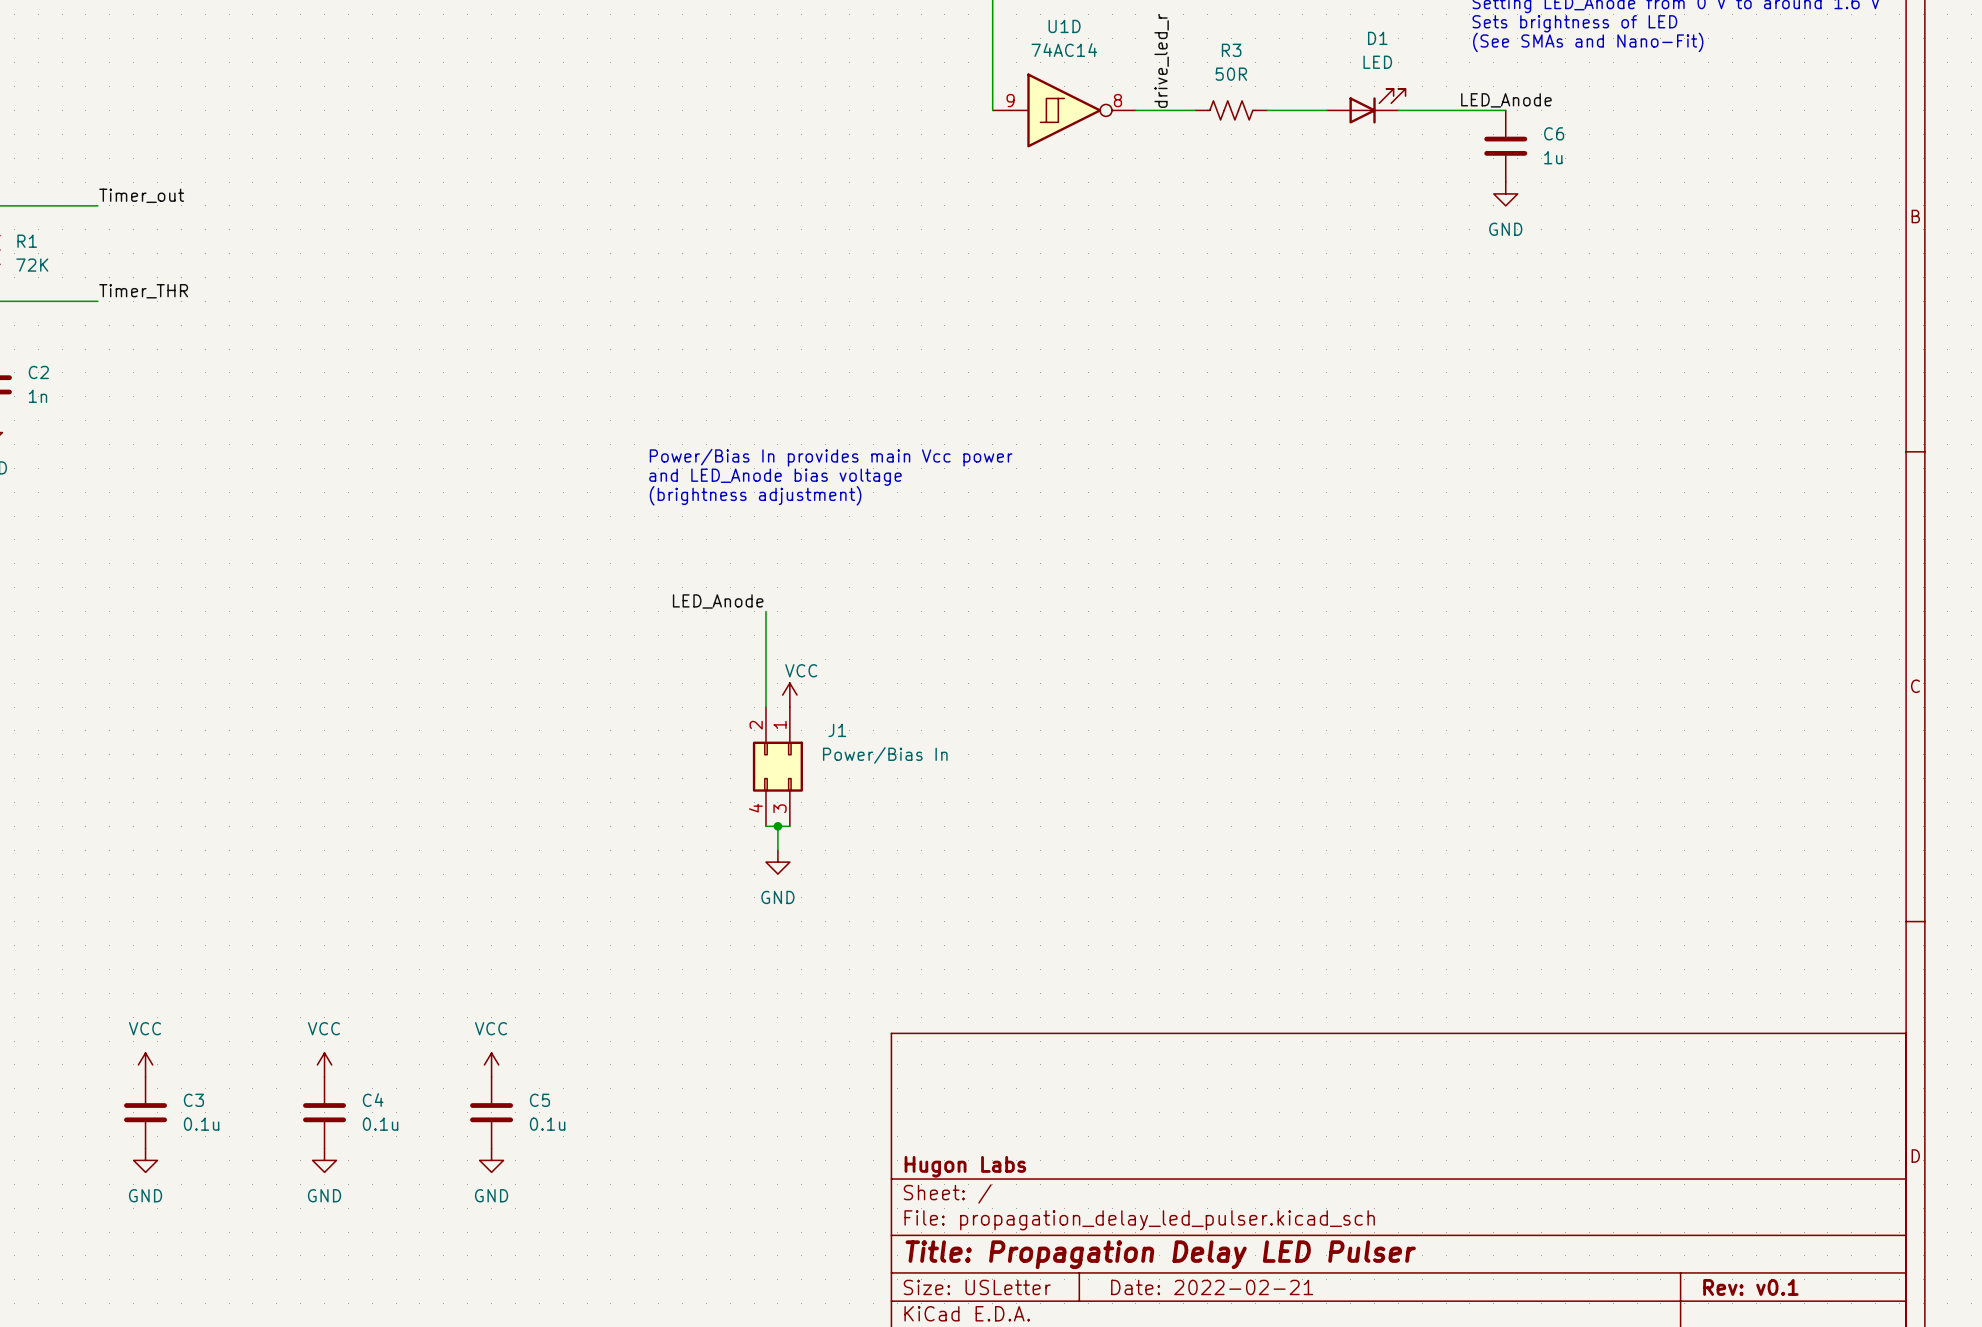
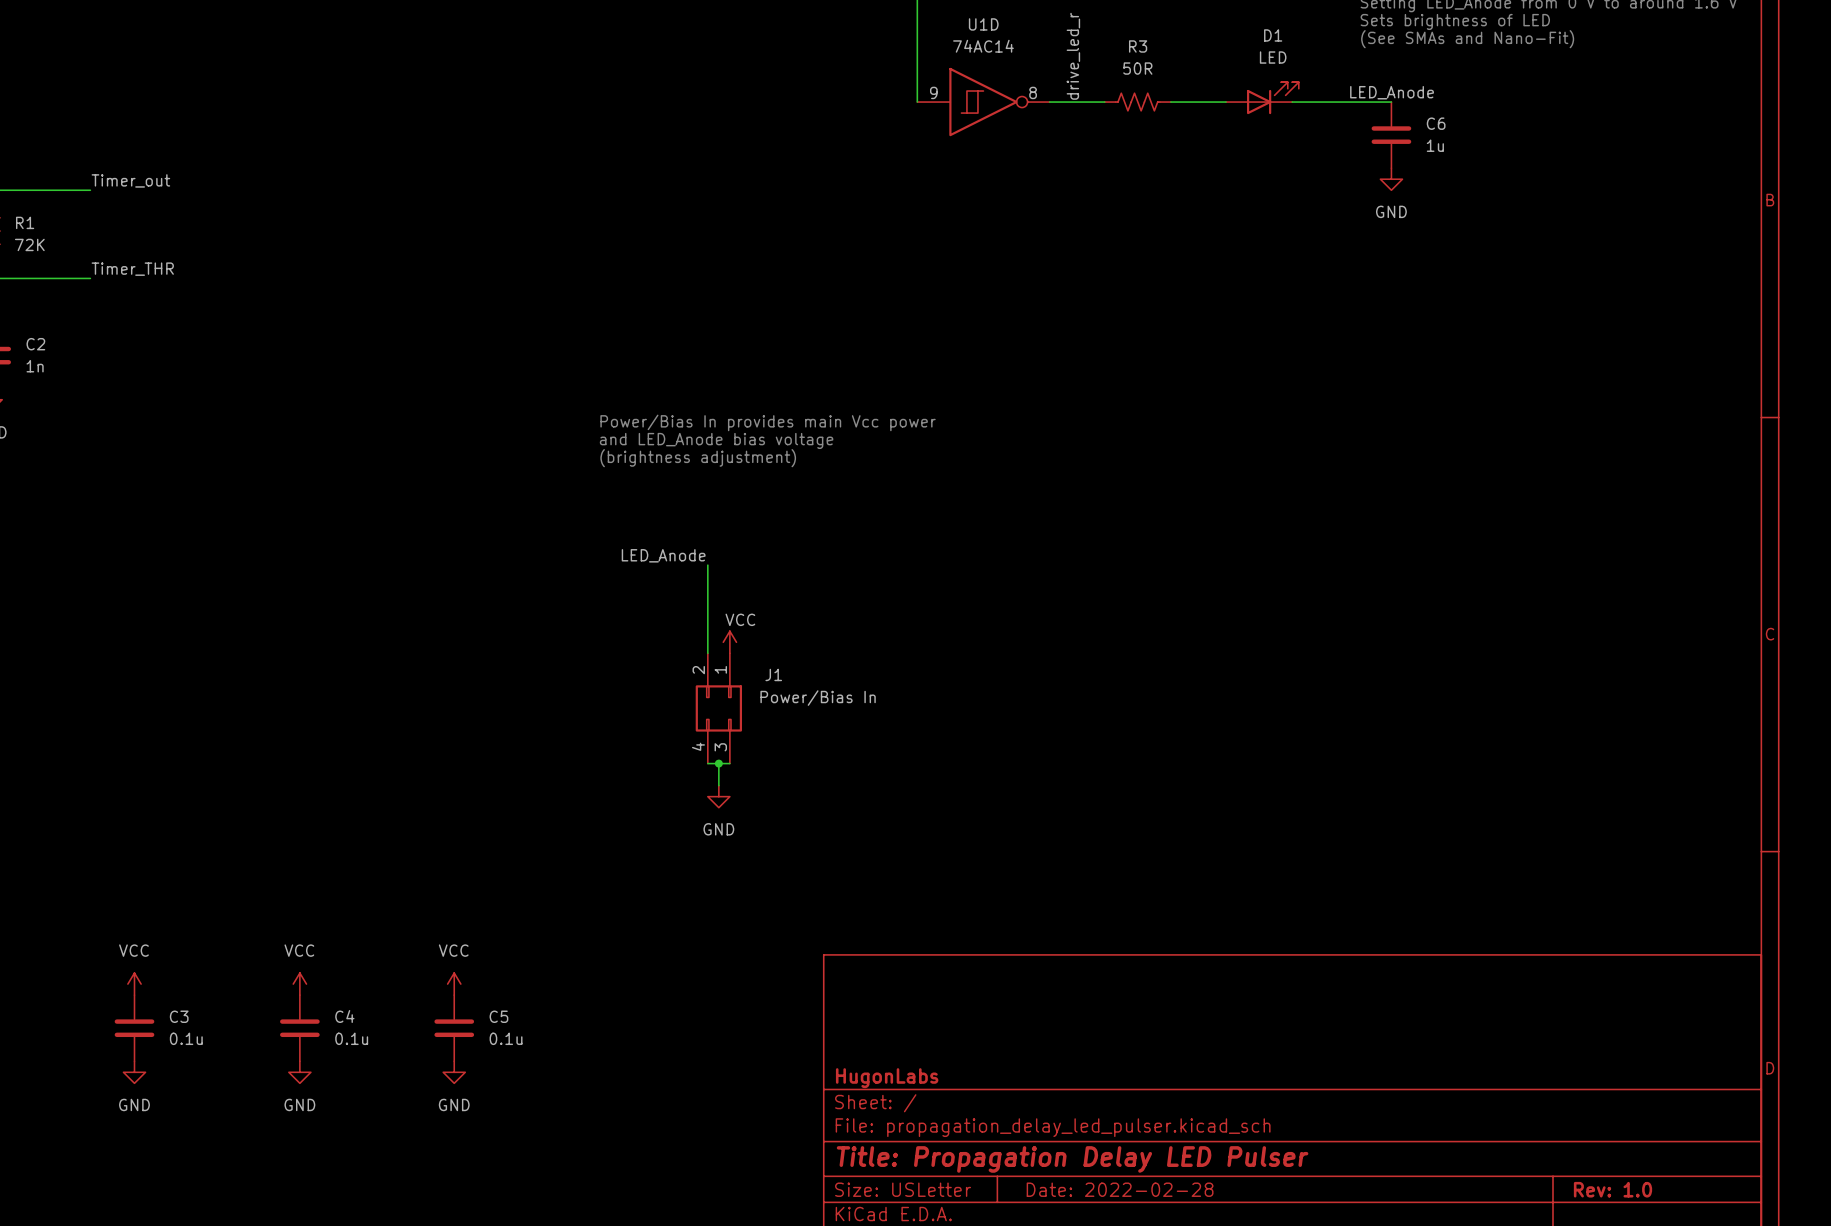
title block: Hugon Labs (965, 1166) -> HugonLabs (887, 1078)
title block: Date: 2022-02-21 (1212, 1287) -> Date: 2022-02-28 (1120, 1189)
title block: Rev: v0.1 (1750, 1287) -> Rev: 1.0 (1613, 1189)

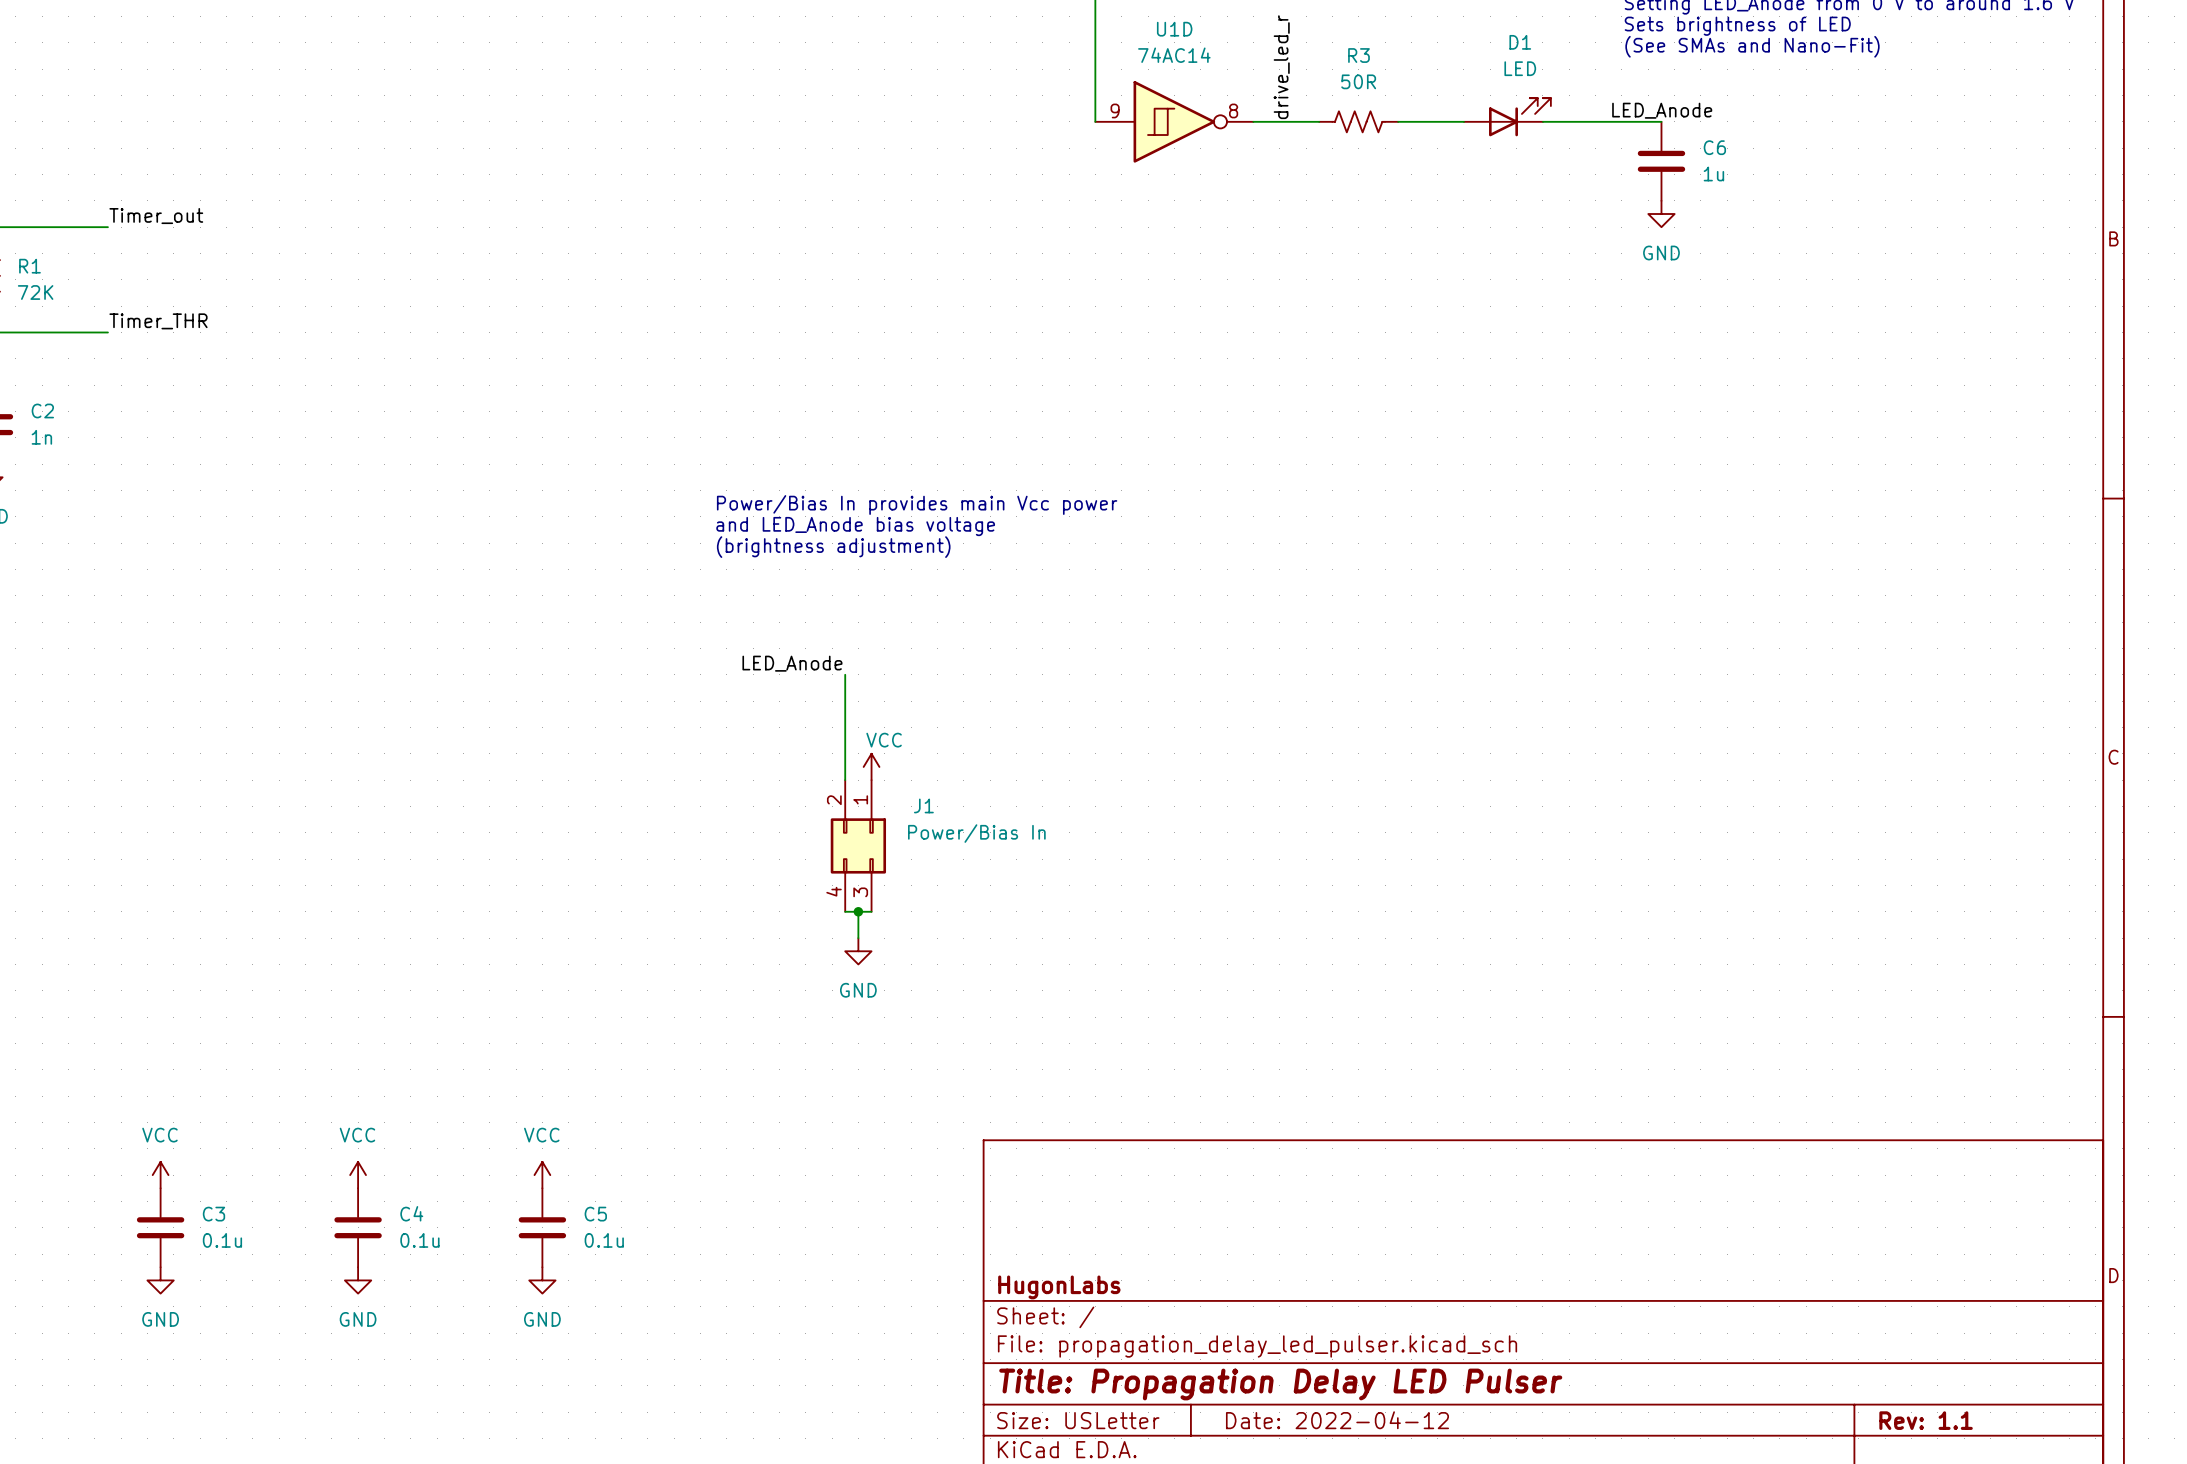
title block: Date: 2022-02-28 (1120, 1189) -> Date: 2022-04-12 (1337, 1420)
title block: Rev: 1.0 (1613, 1189) -> Rev: 1.1 (1926, 1420)

